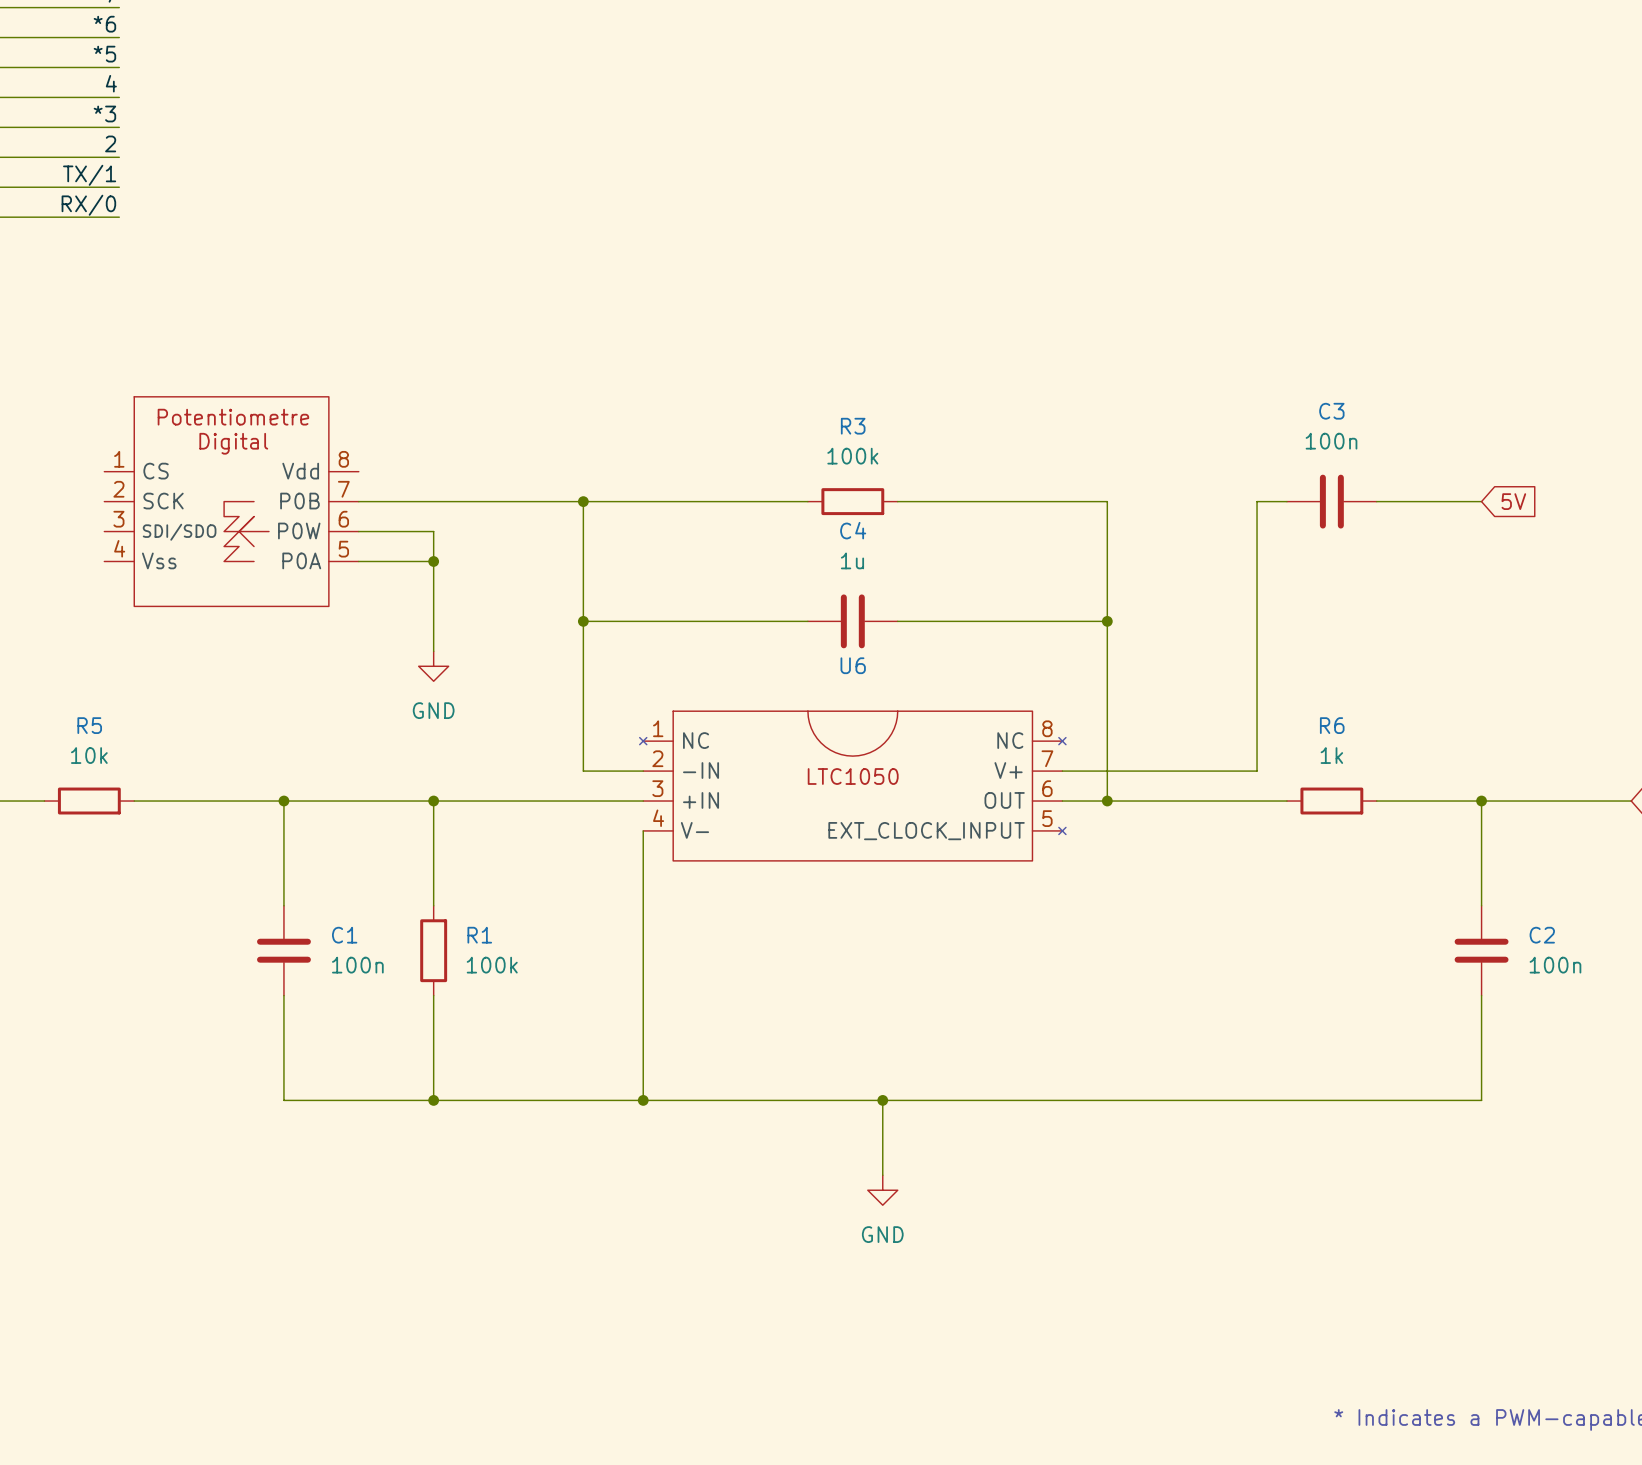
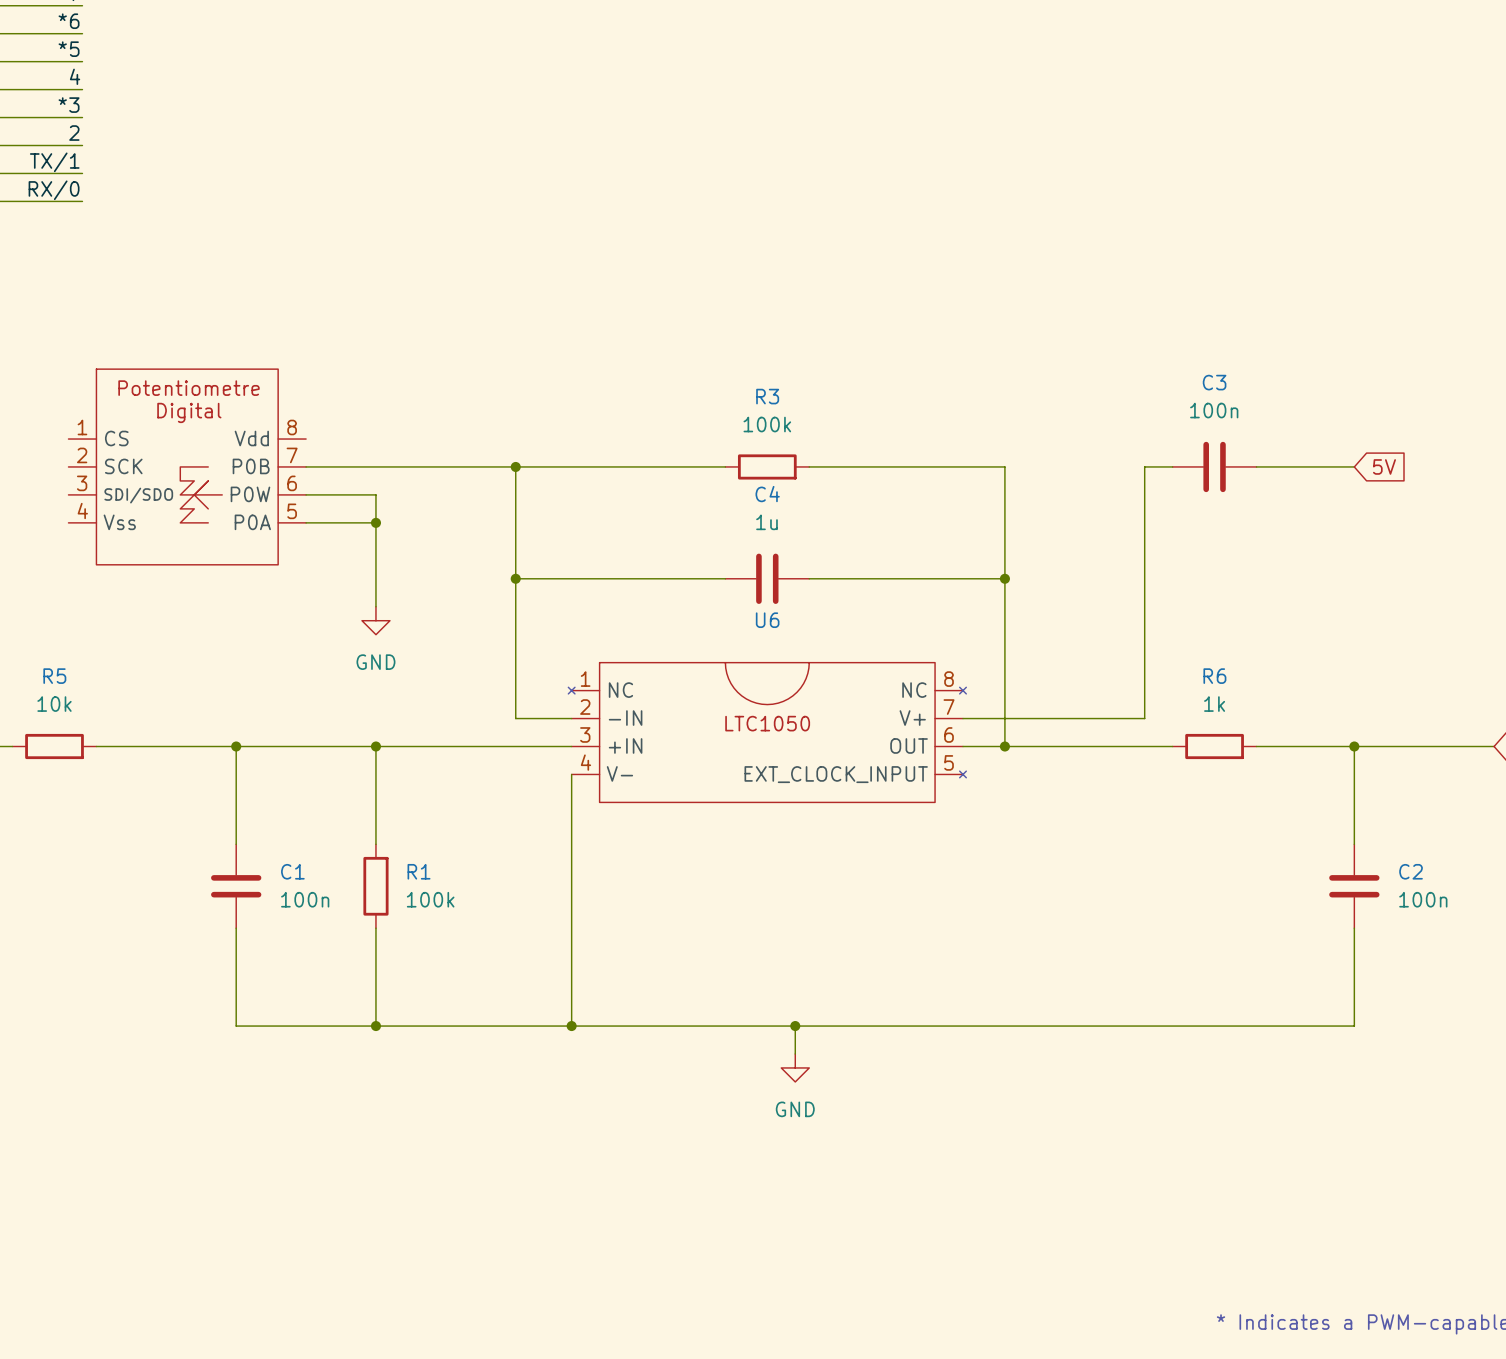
wire: (882, 1130) (882, 1175) -> none
power symbol position: GND (882, 1190) -> GND (795, 1067)

